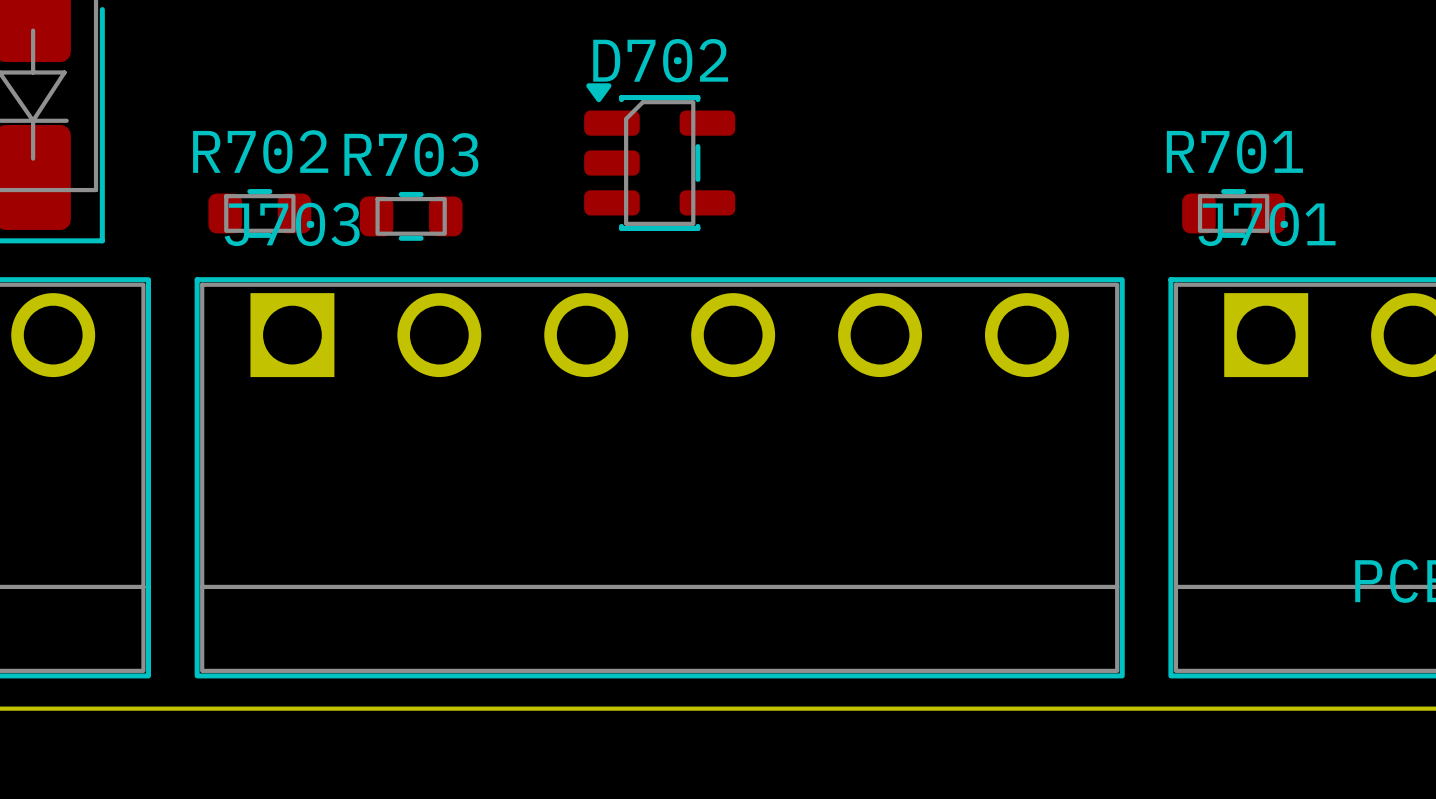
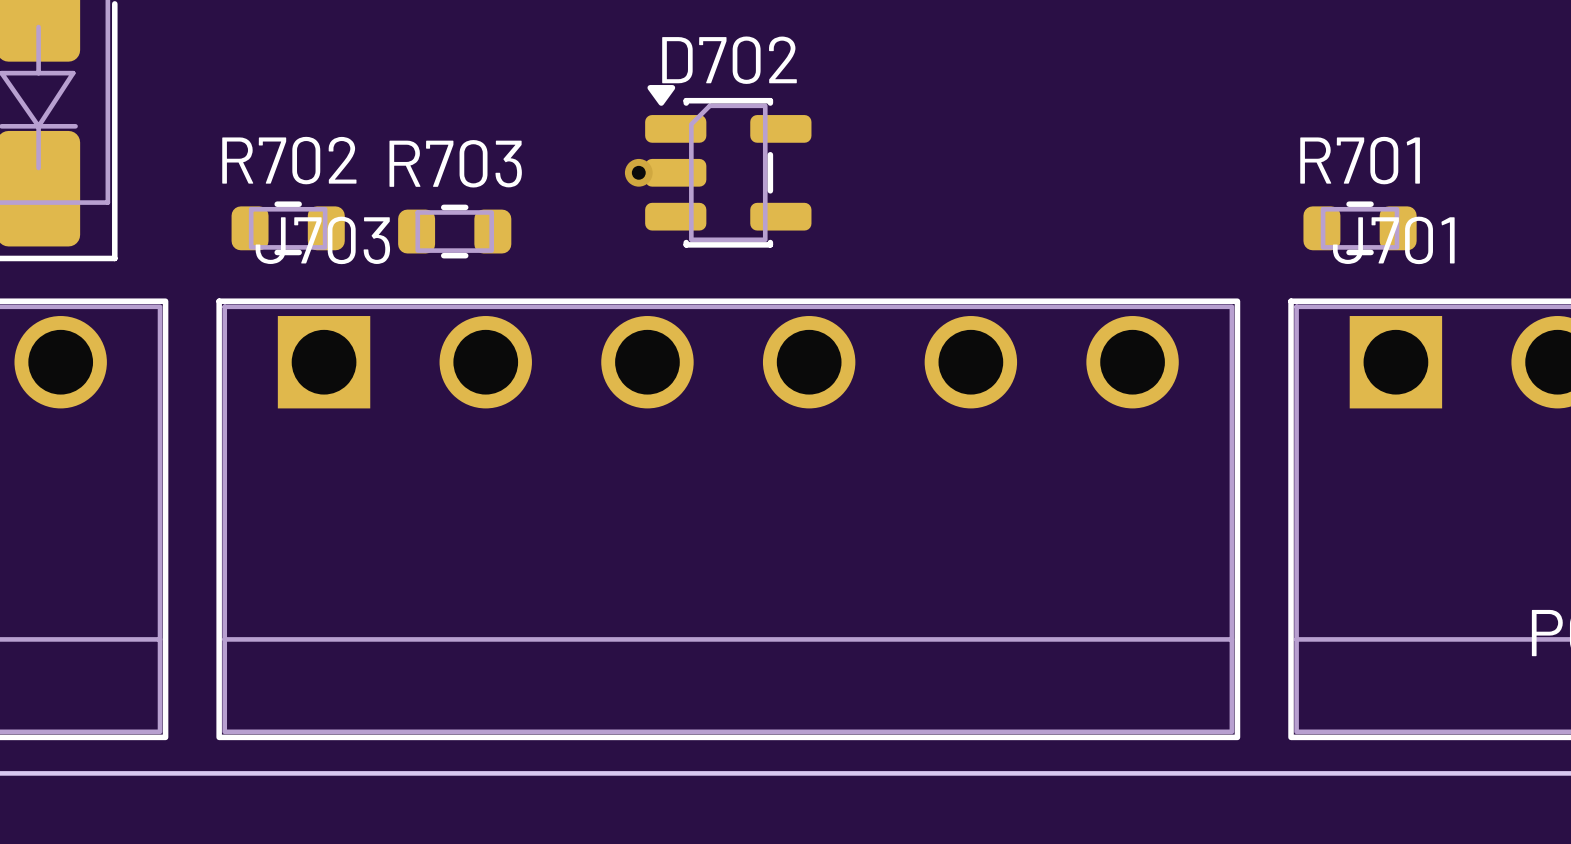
via: none -> (638, 172)

